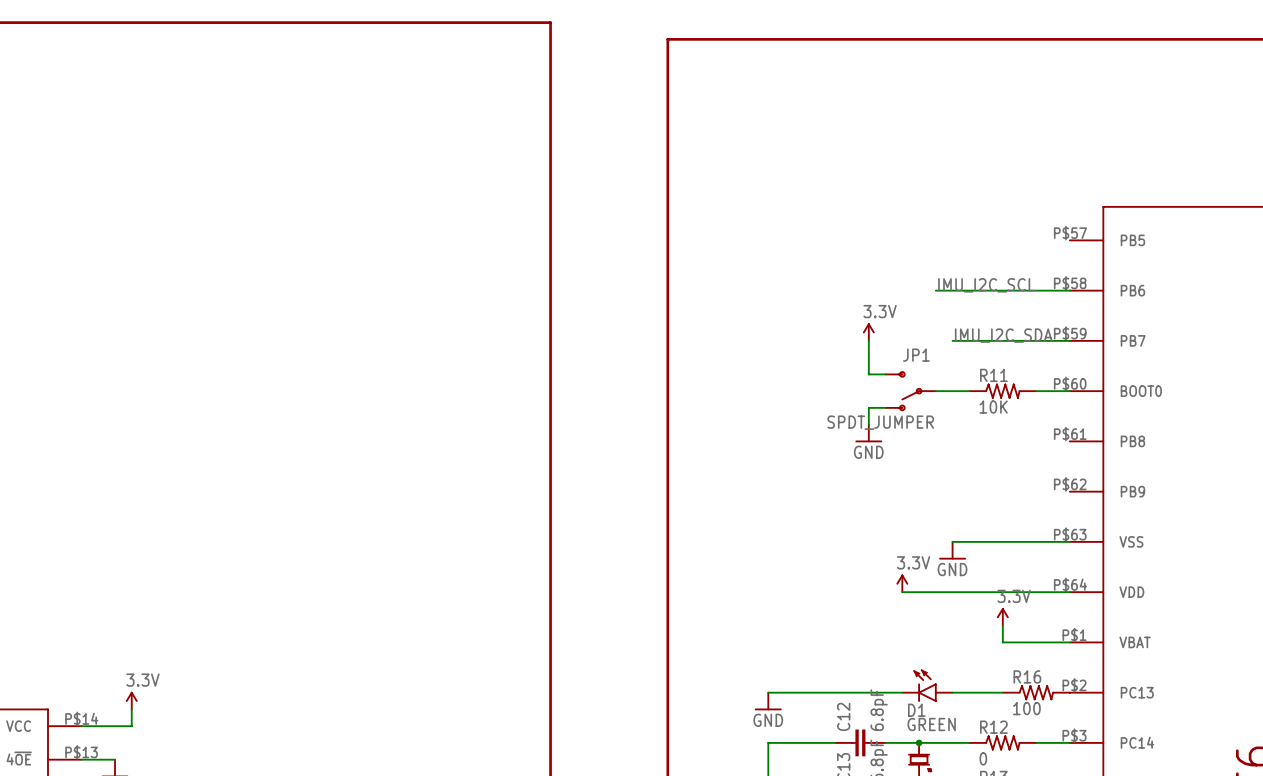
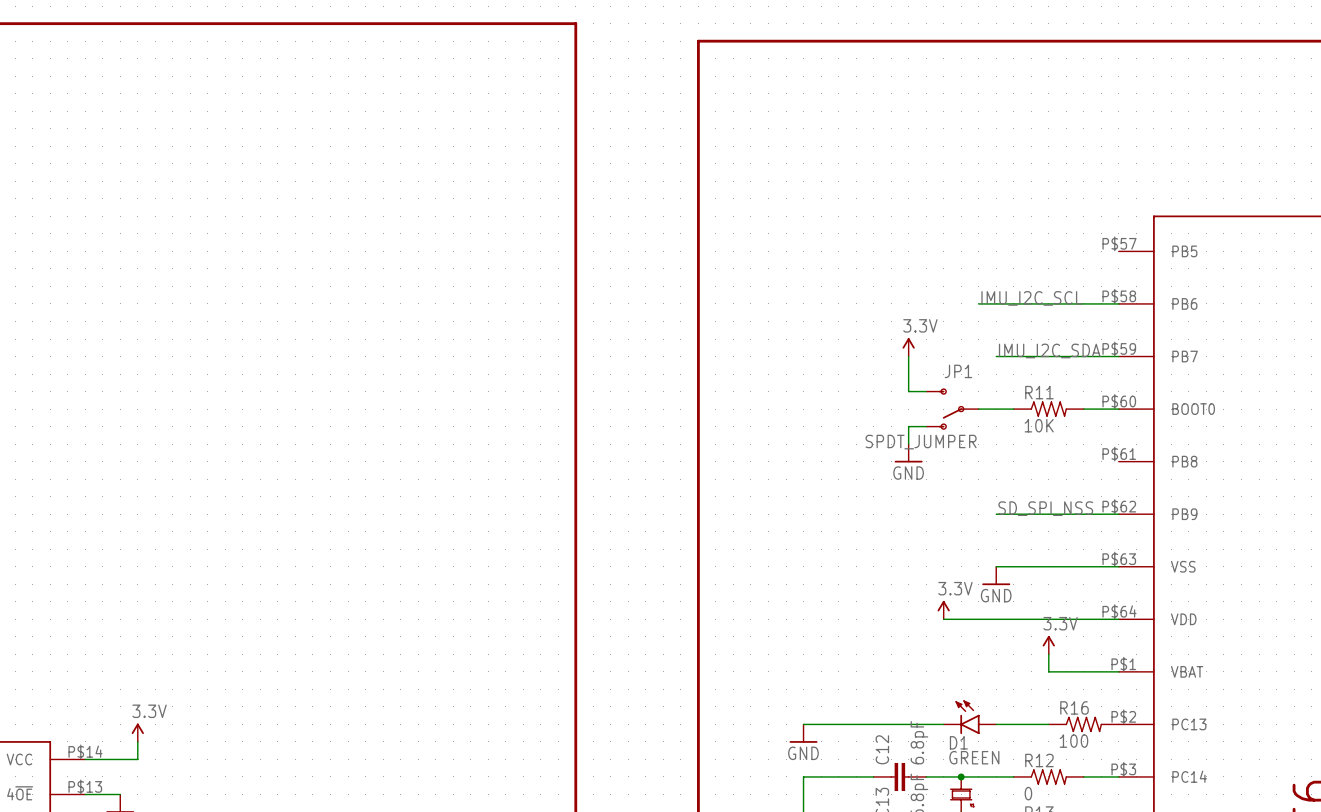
label: none -> SD_SPI_NSS (1045, 508)
wire: none -> (996, 514) (1118, 514)

